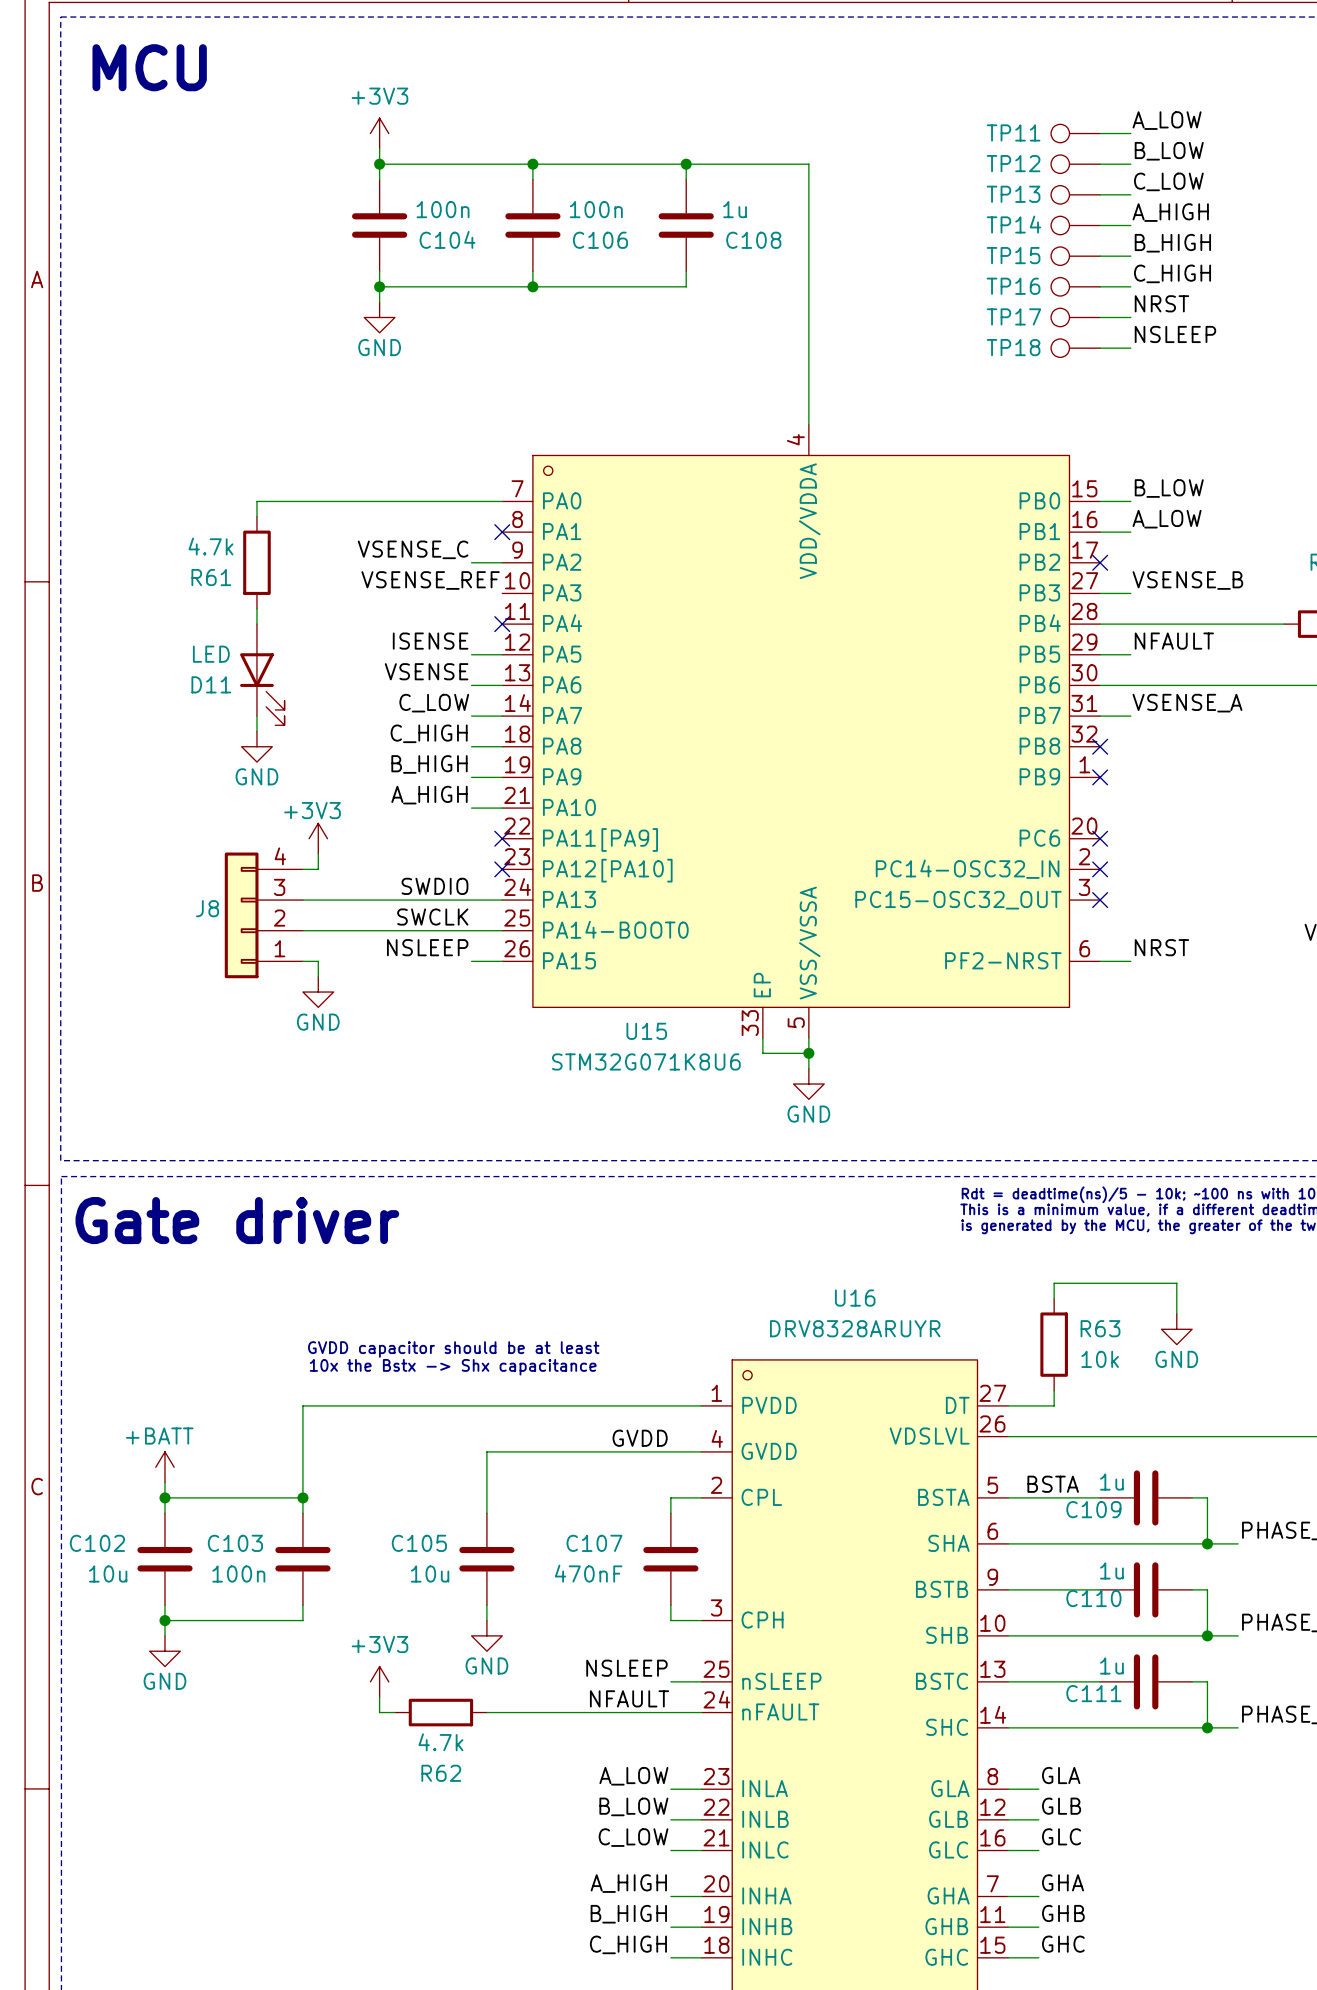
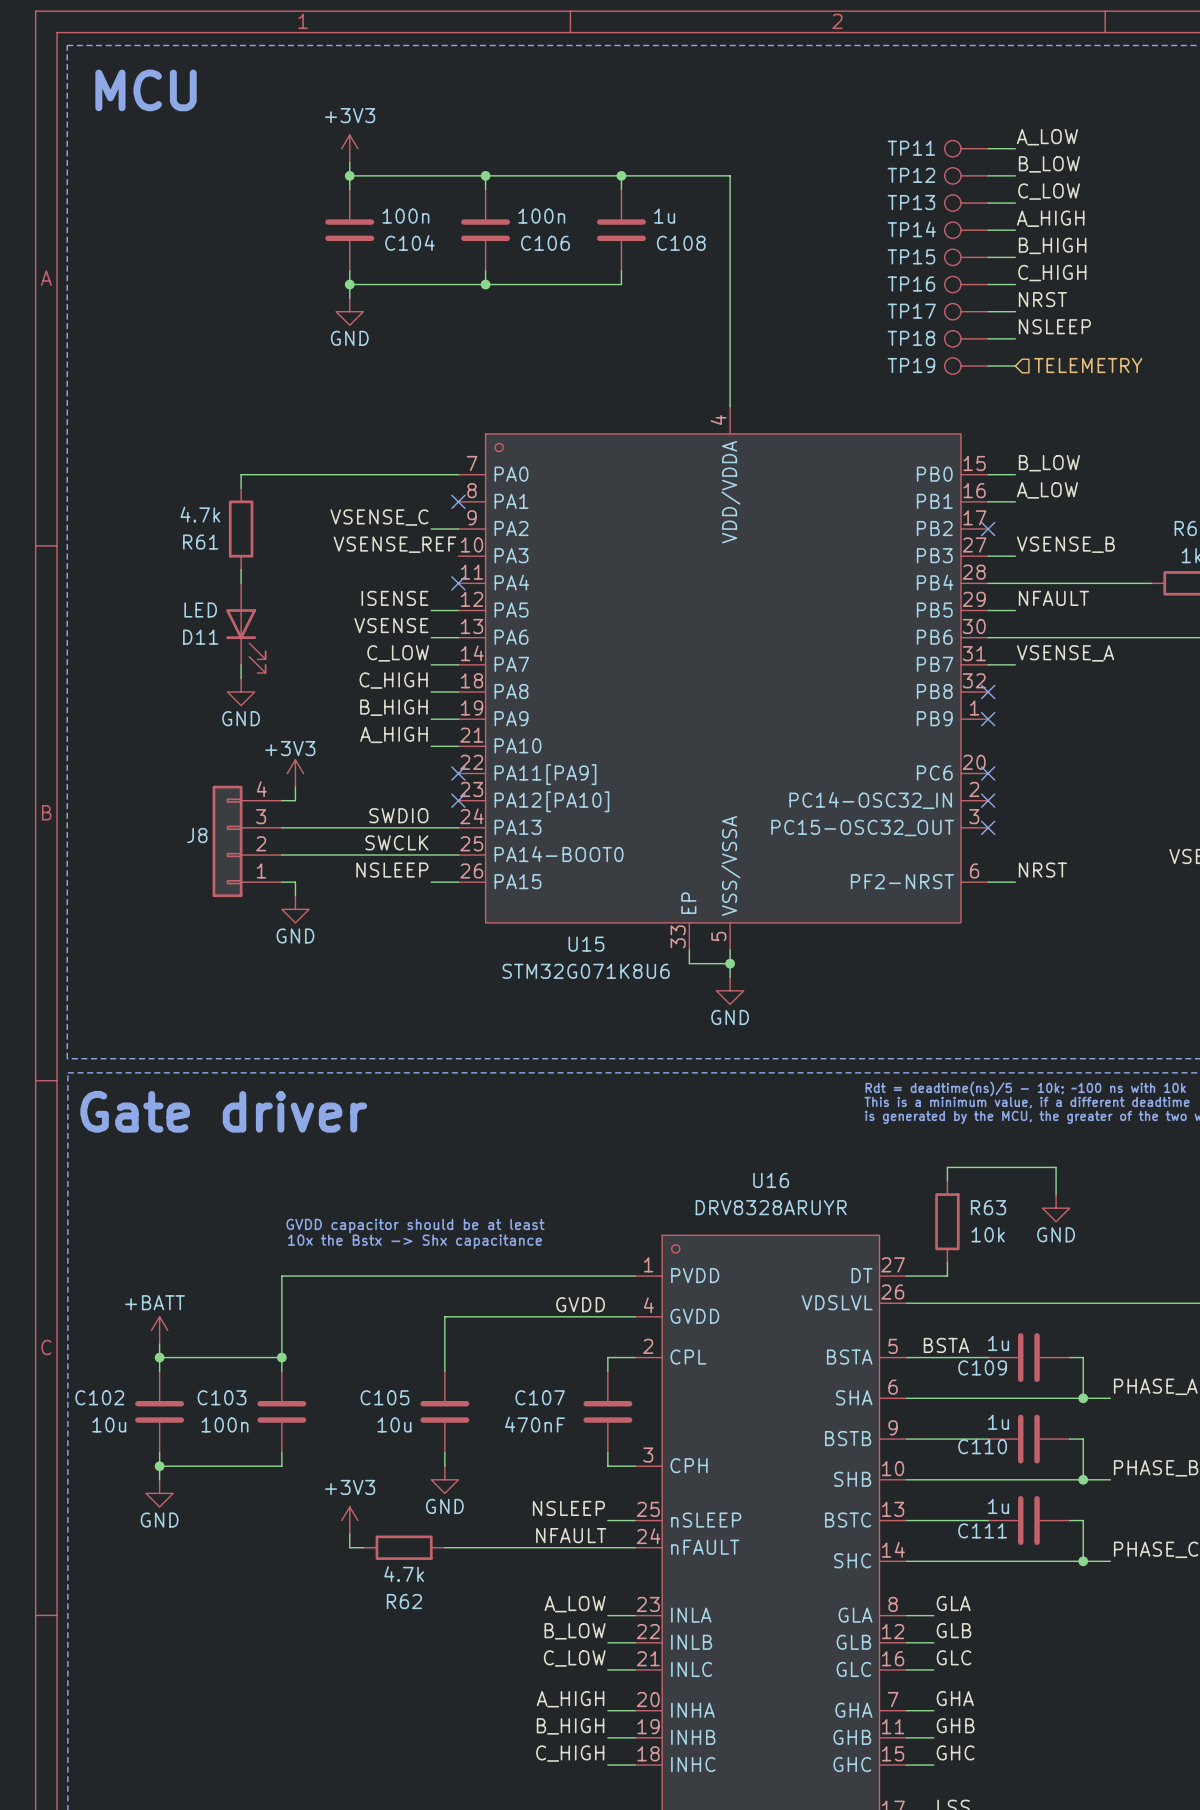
TP19: none -> (966, 366)
wire: none -> (988, 366) (1015, 366)
hierarchical label: none -> TELEMETRY (1088, 365)

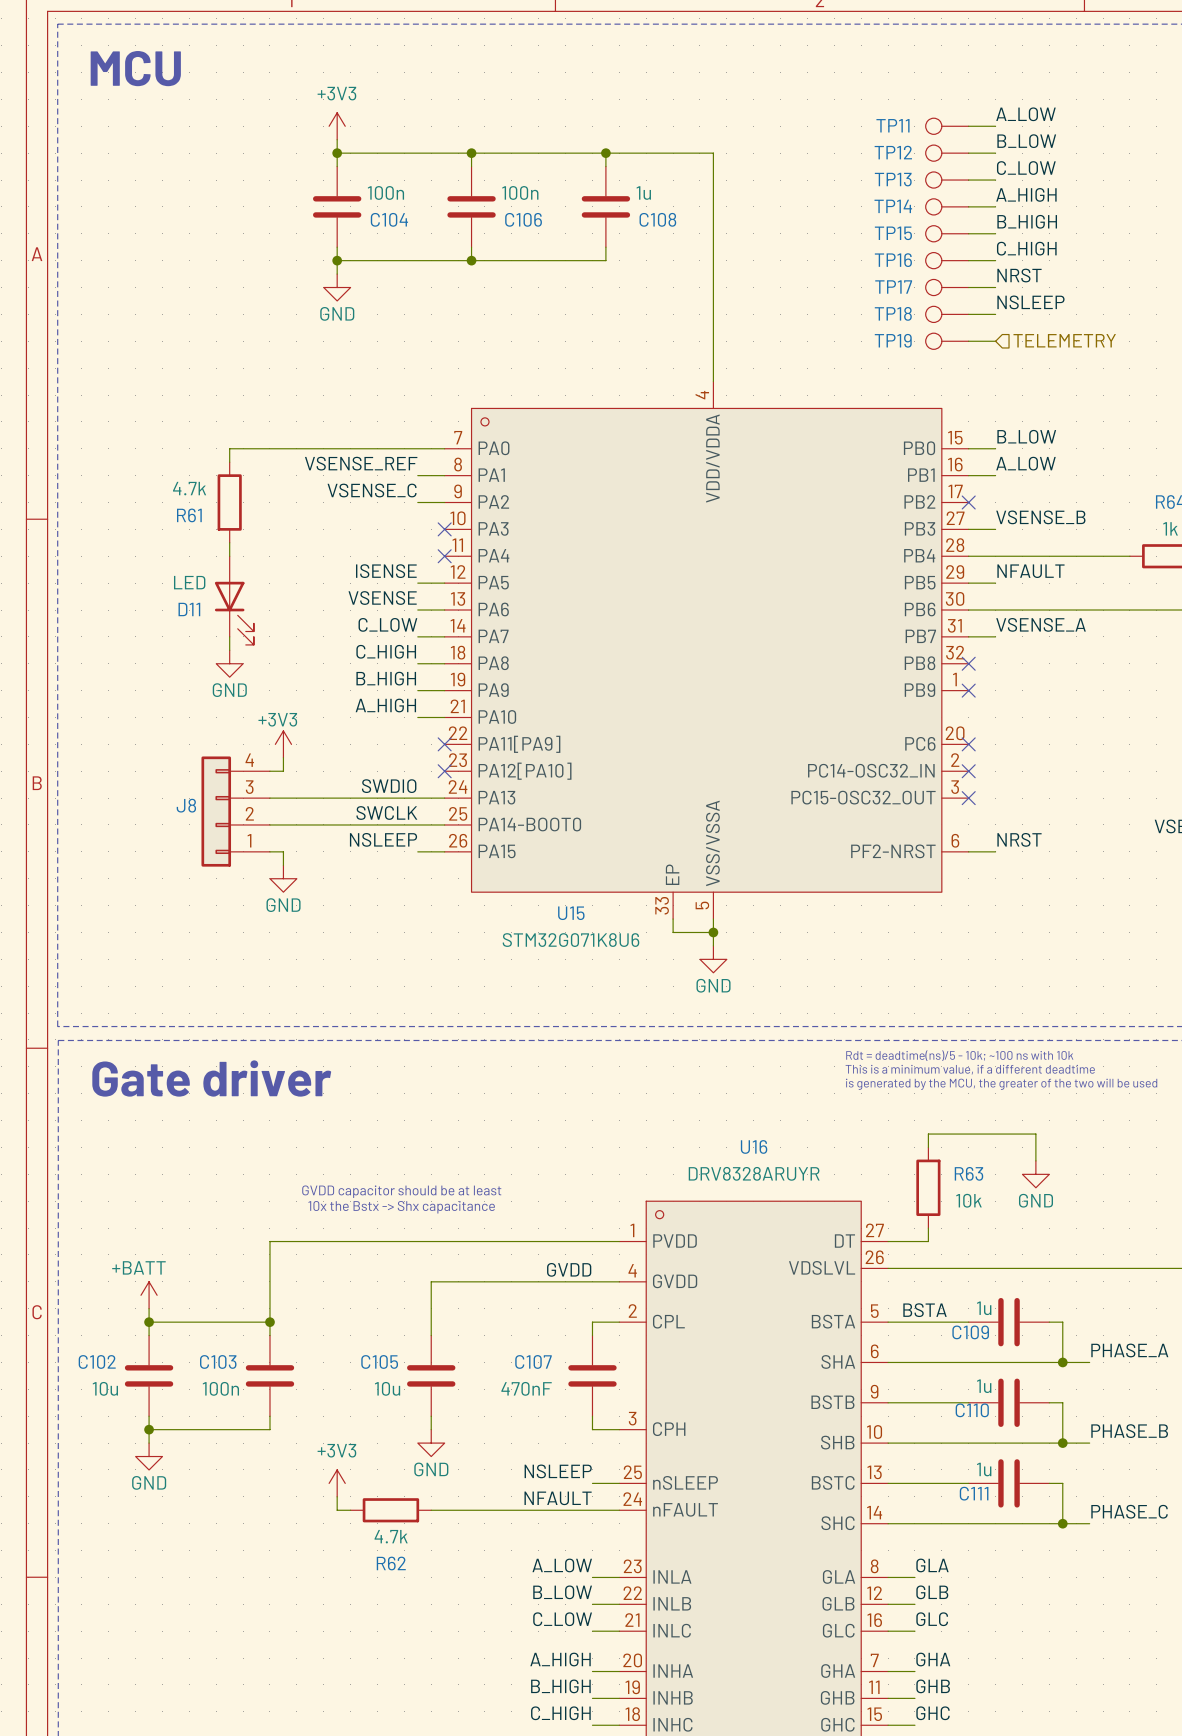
wire: none -> (417, 475) (444, 475)
no-connect mark position: (458, 501) -> (444, 529)
label position: VSENSE_REF (394, 544) -> VSENSE_REF (361, 463)

